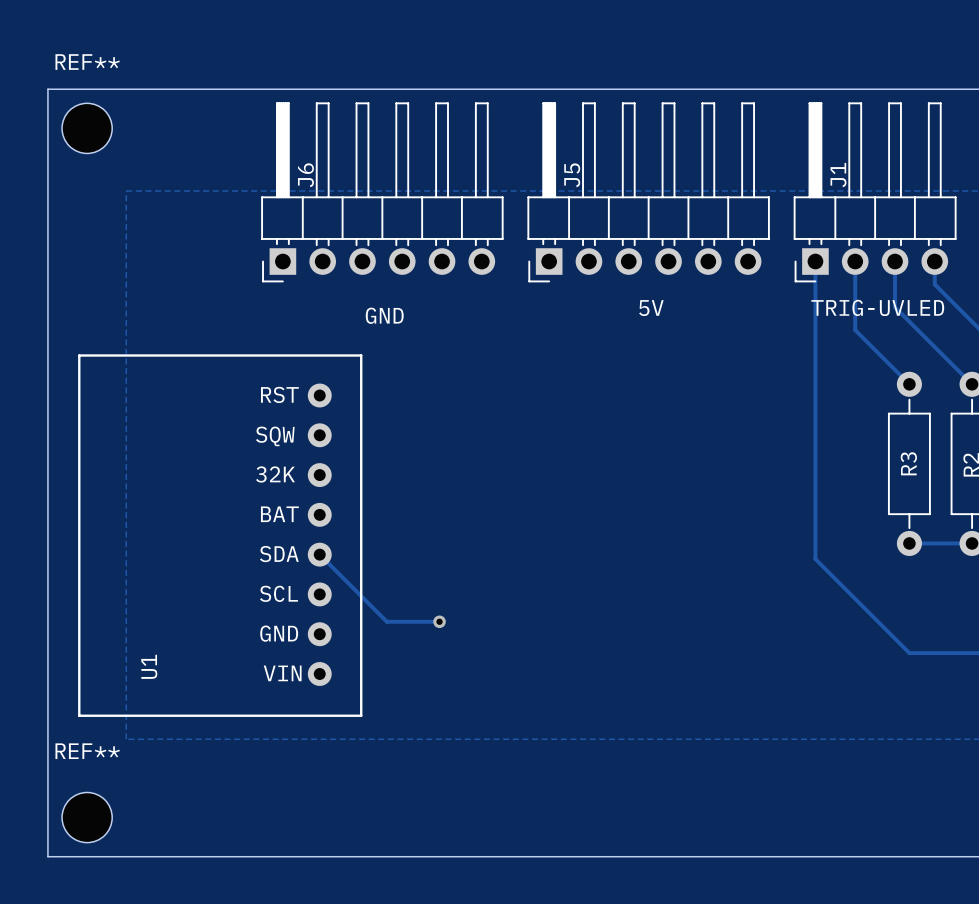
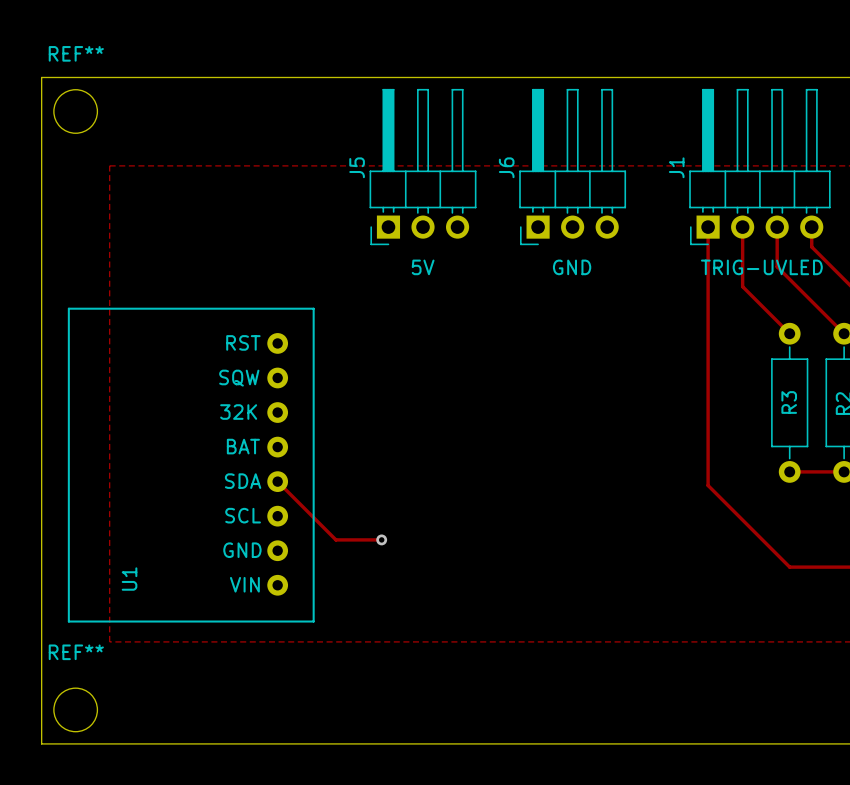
J6 footprint: [261, 102, 504, 283] -> [519, 88, 627, 246]
J5 footprint: [527, 102, 770, 283] -> [369, 88, 477, 246]
J1 name position: J1 (838, 175) -> J1 (676, 167)
text: none -> 5V (423, 267)
text: 5V (651, 308) -> GND (572, 267)
text: GND (384, 315) -> none

